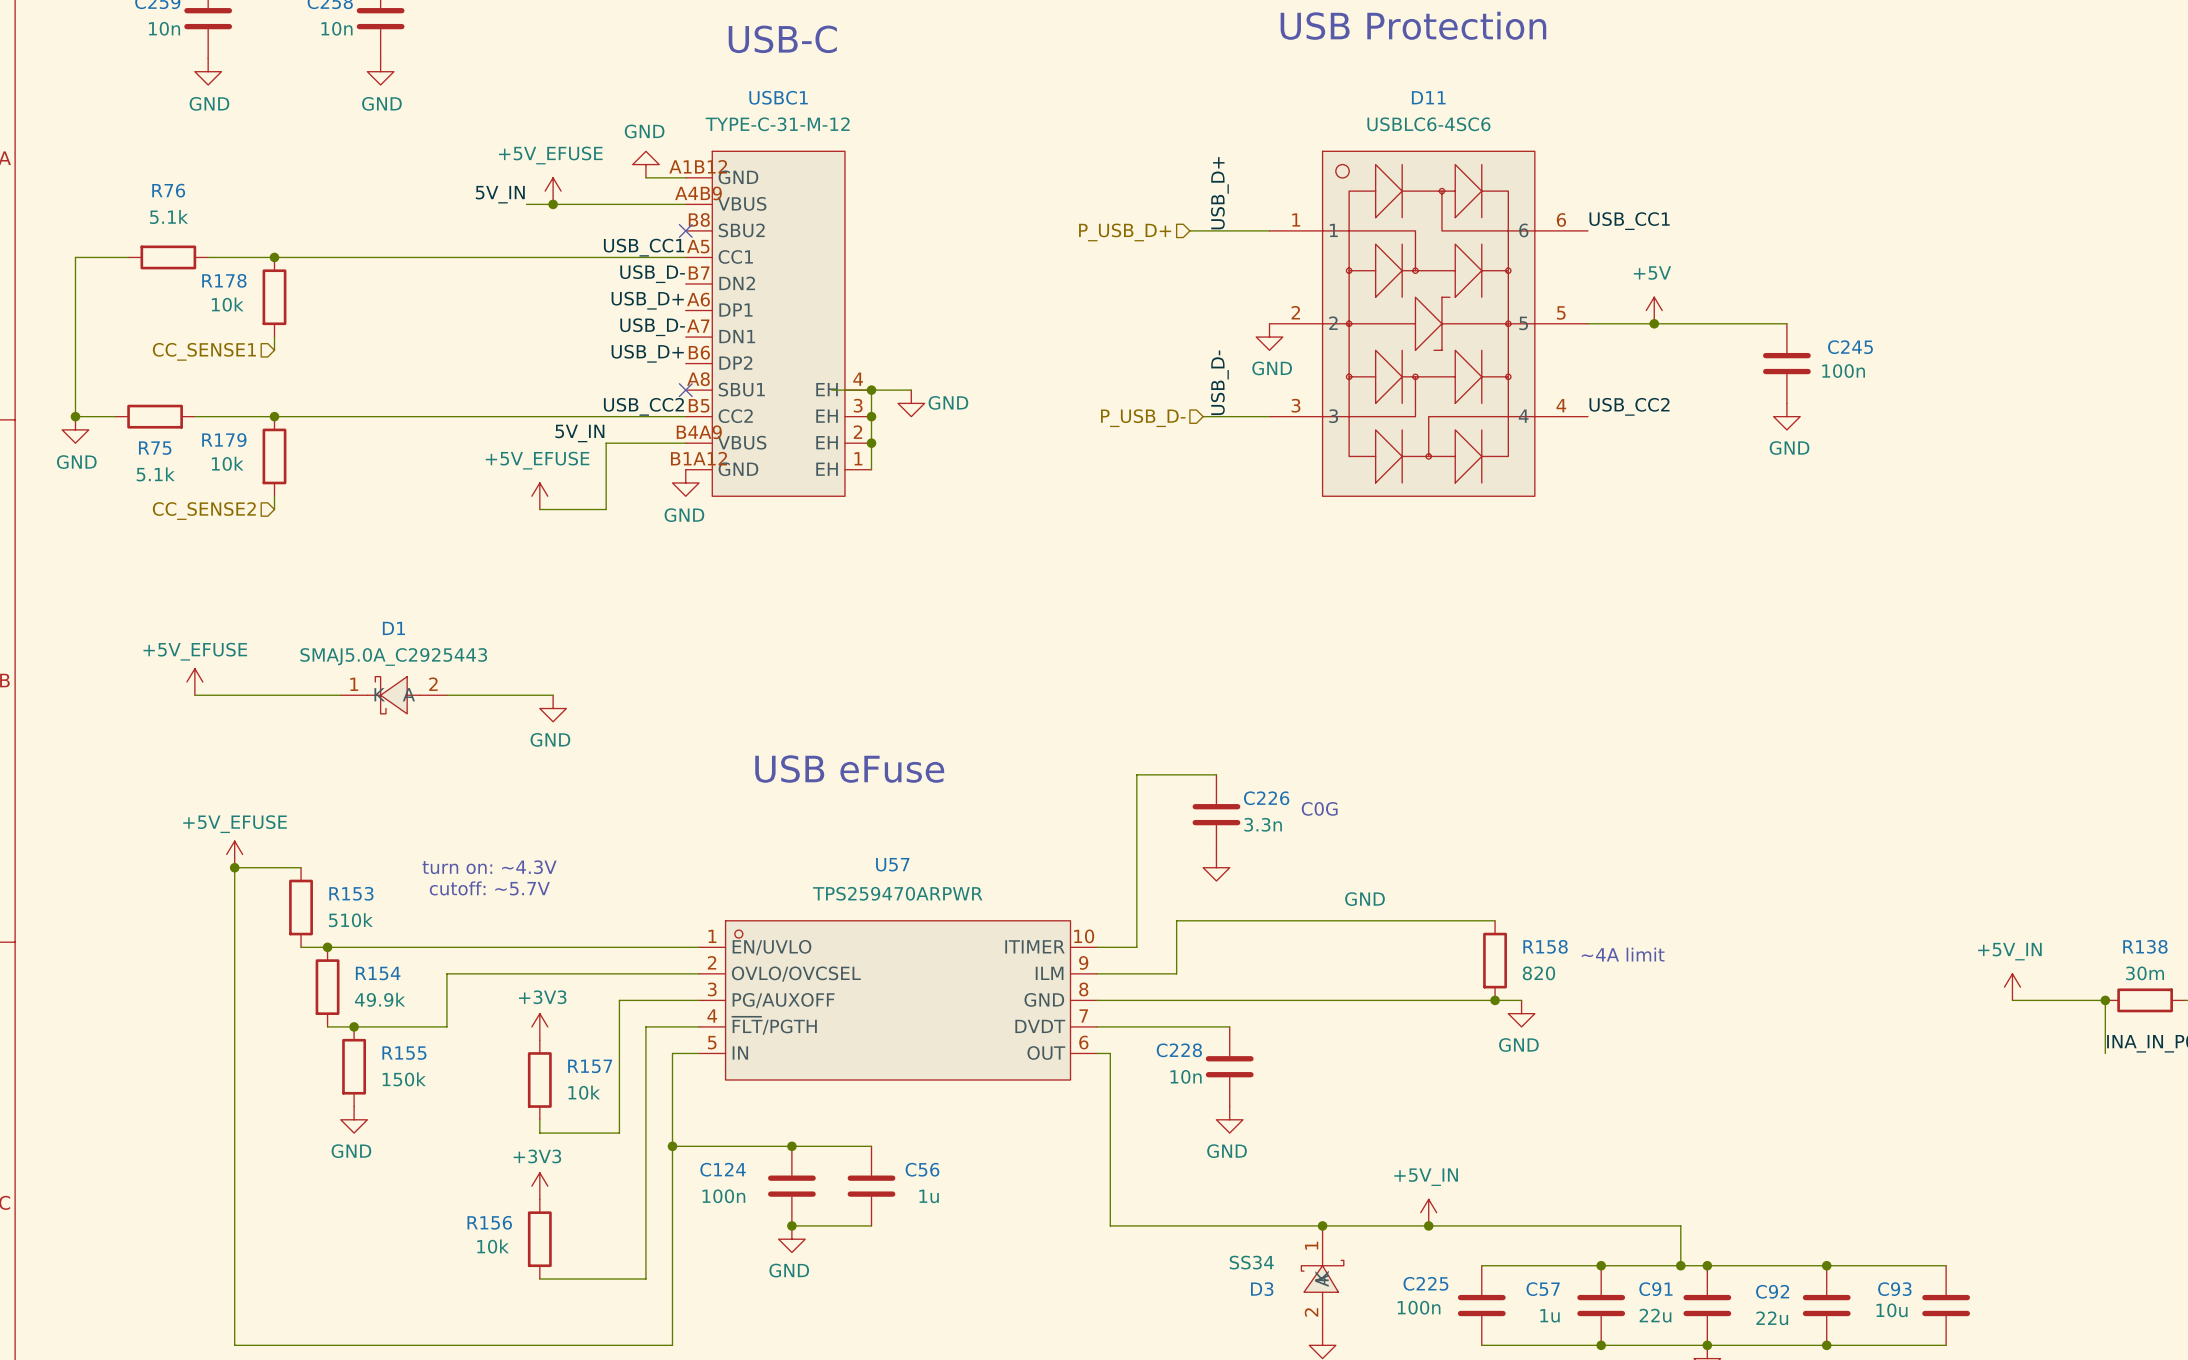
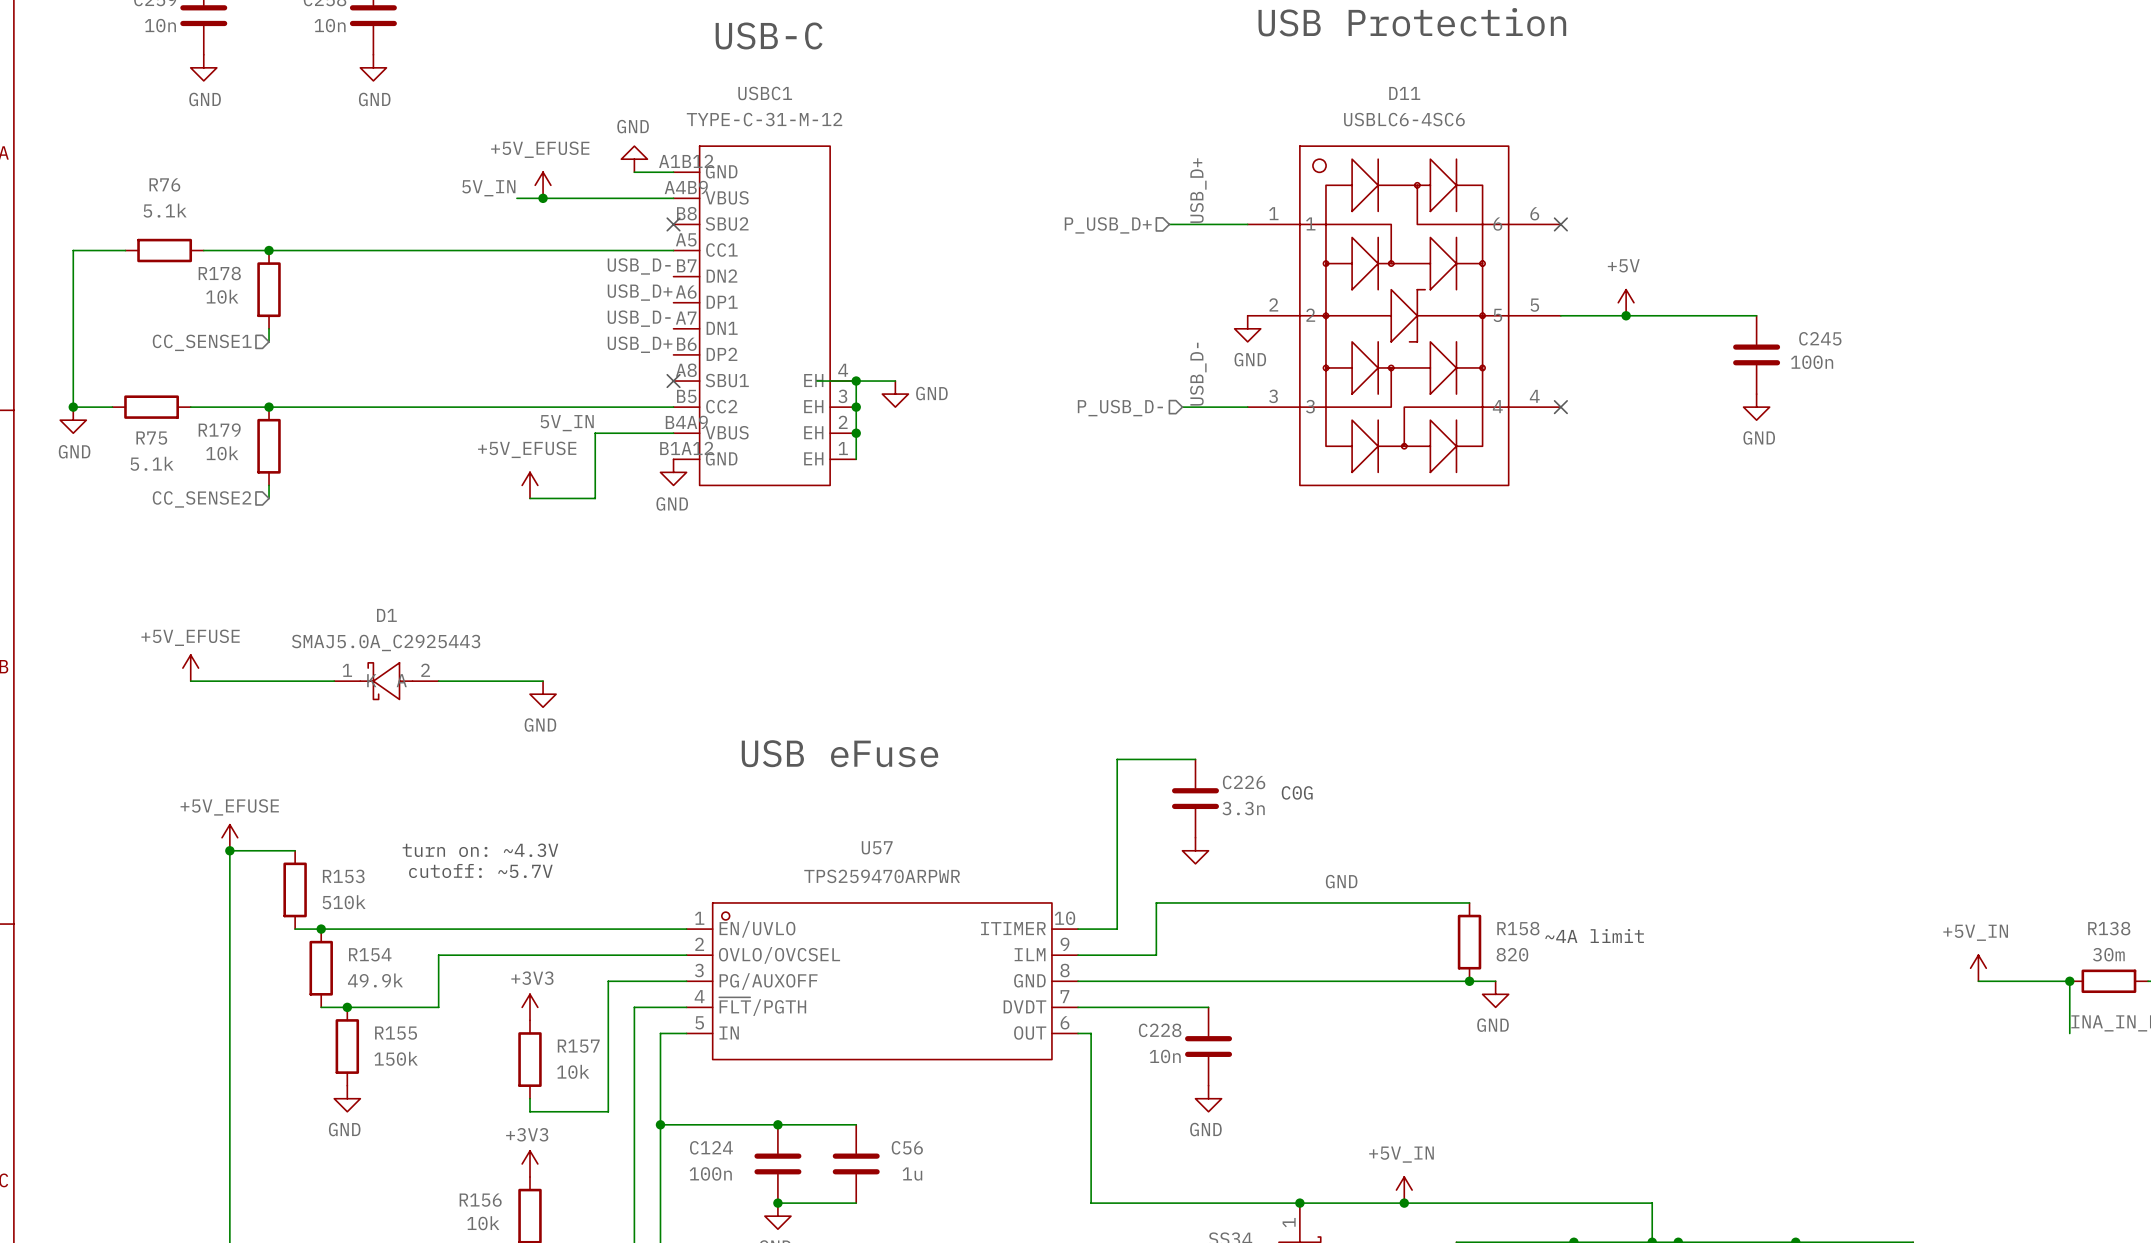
label: USB_CC1 (1629, 221) -> none
no-connect mark: none -> (1560, 224)
label: USB_CC1 (643, 247) -> none
label: USB_CC2 (643, 406) -> none
label: USB_CC2 (1629, 406) -> none
no-connect mark: none -> (1560, 407)

